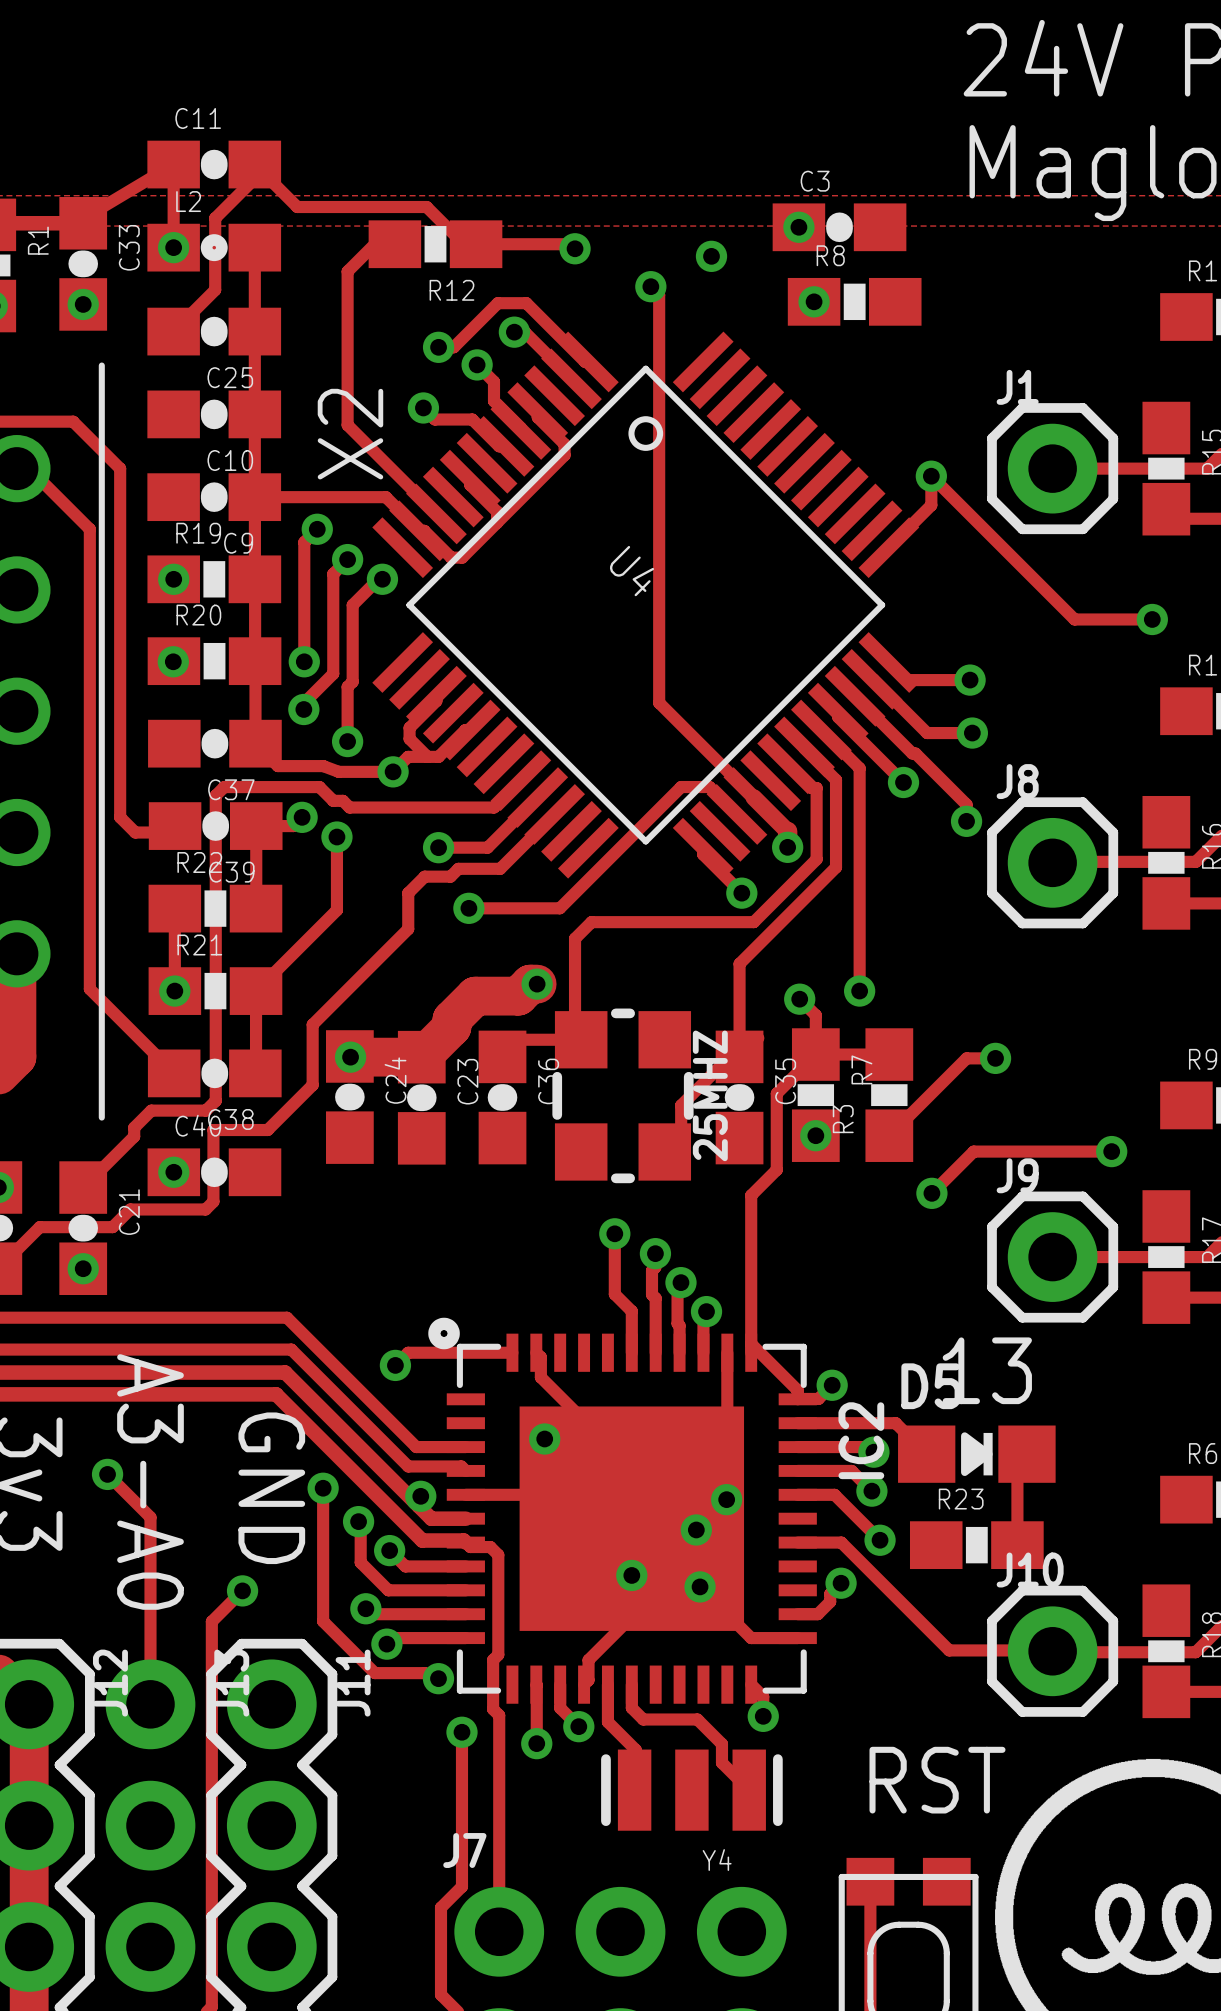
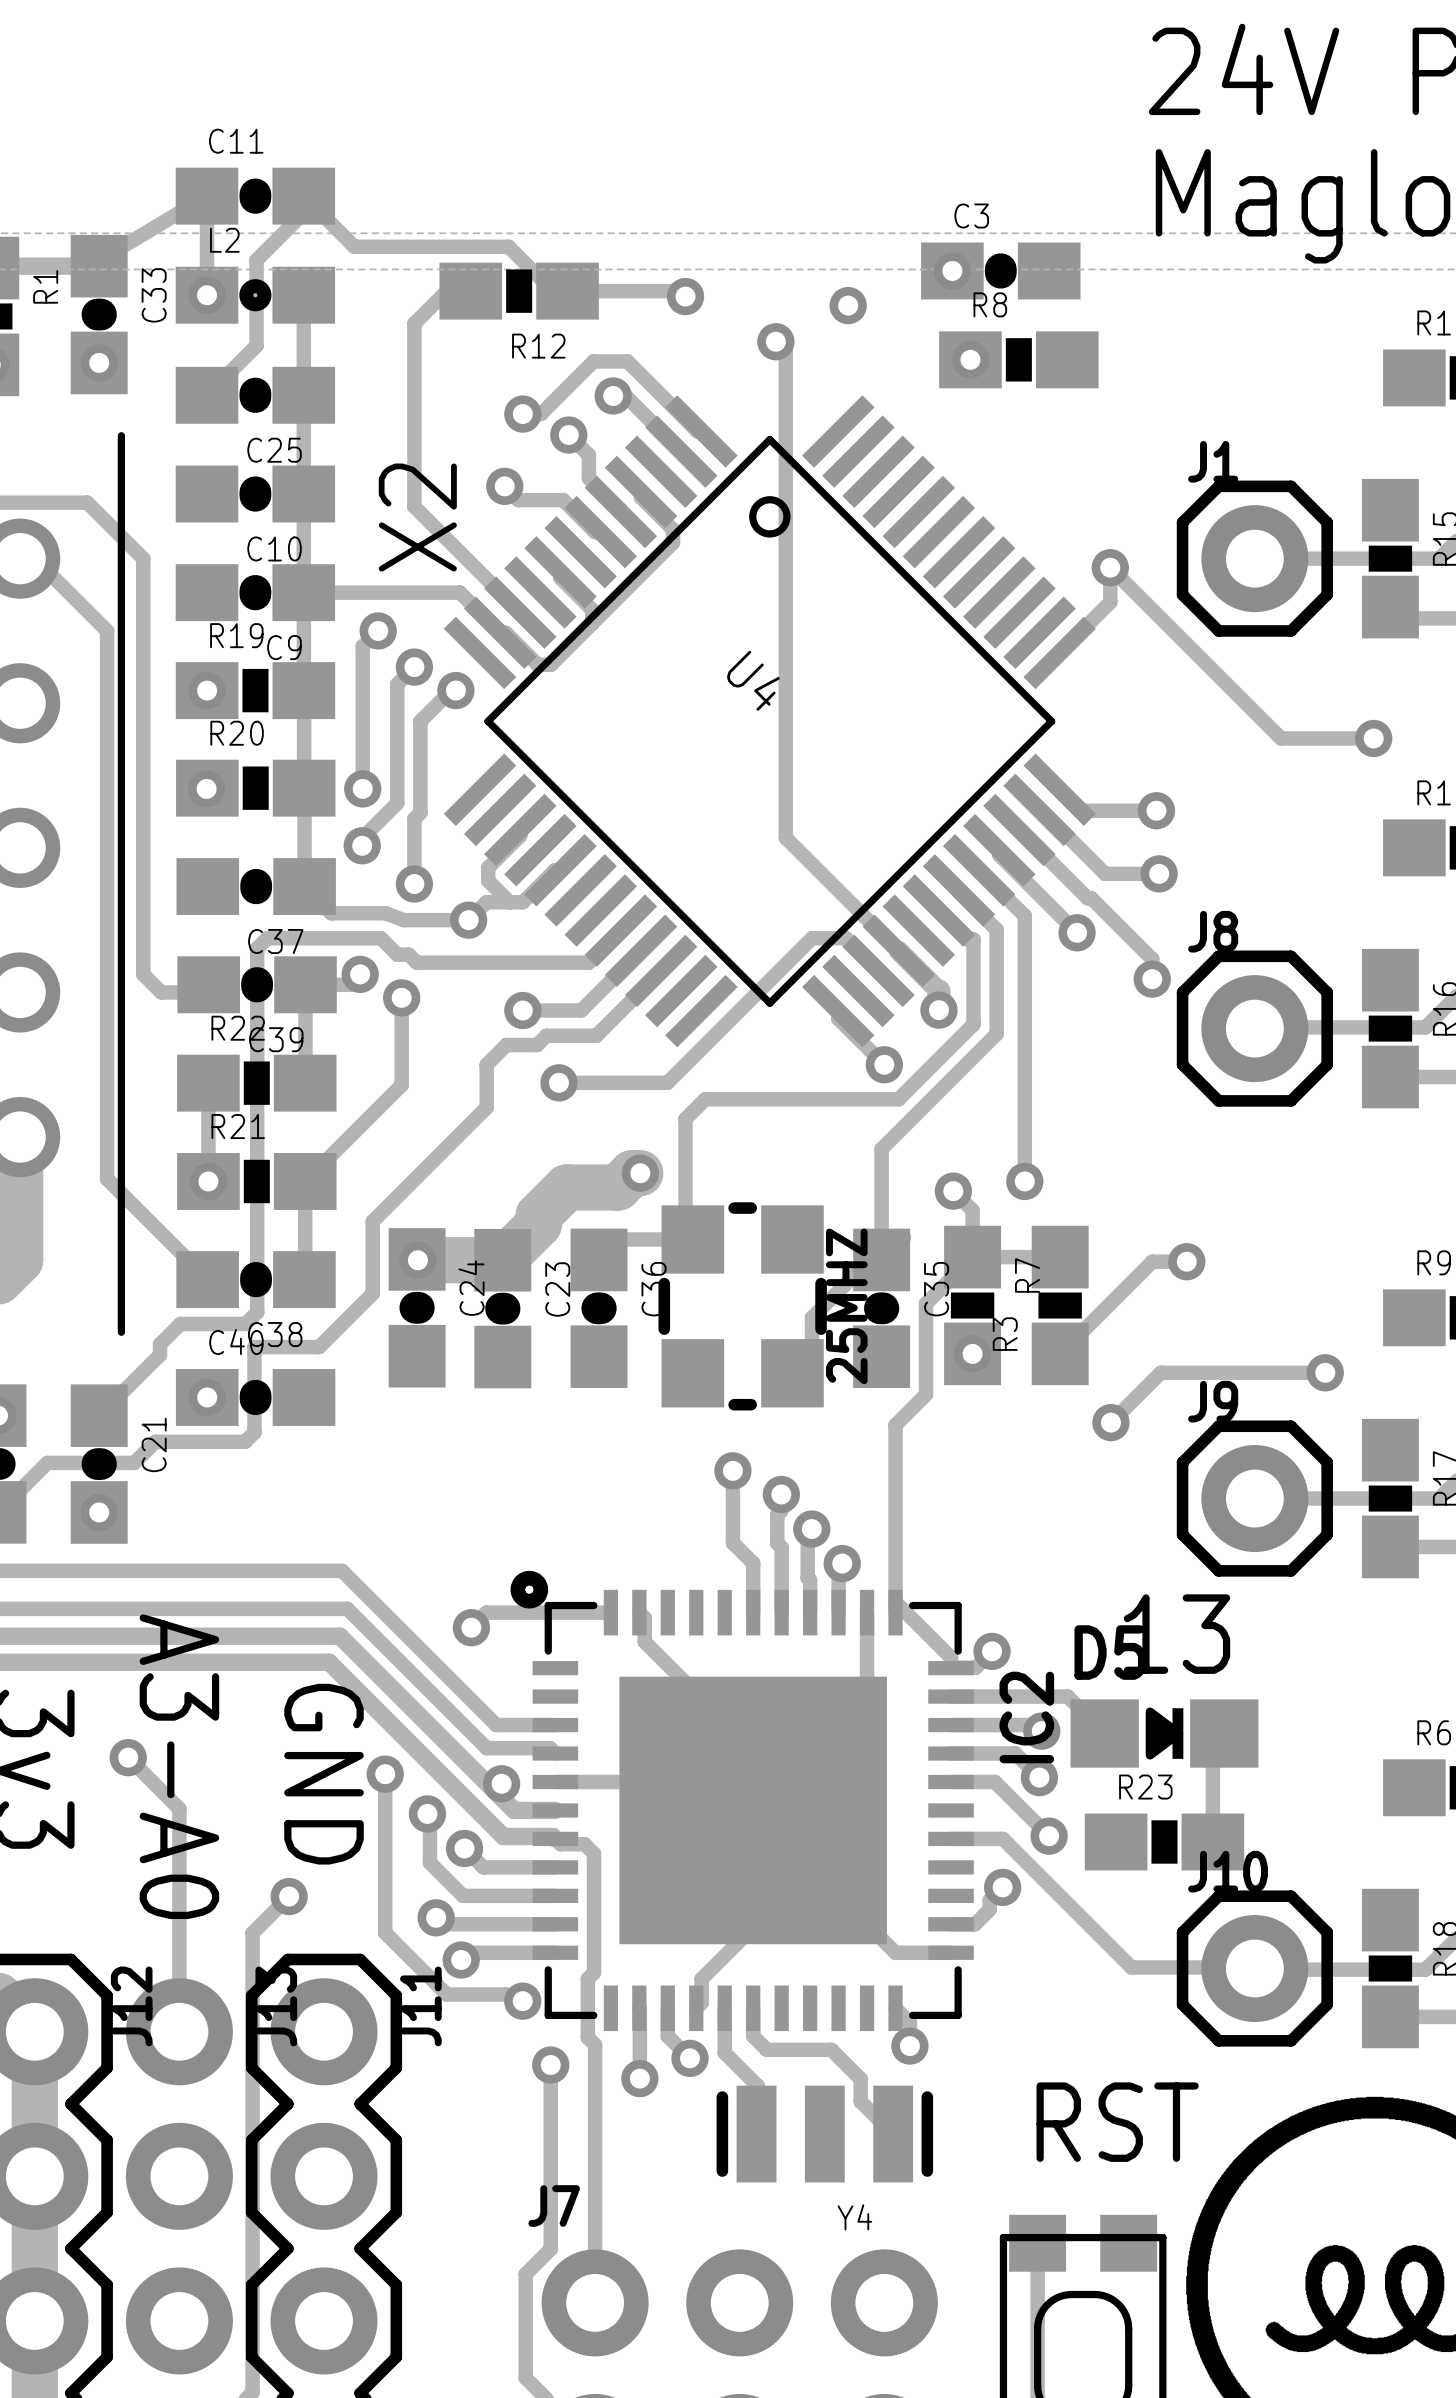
via: (544, 1439) -> none
via: (726, 1499) -> none
via: (696, 1529) -> none
via: (631, 1575) -> none
via: (700, 1586) -> none

